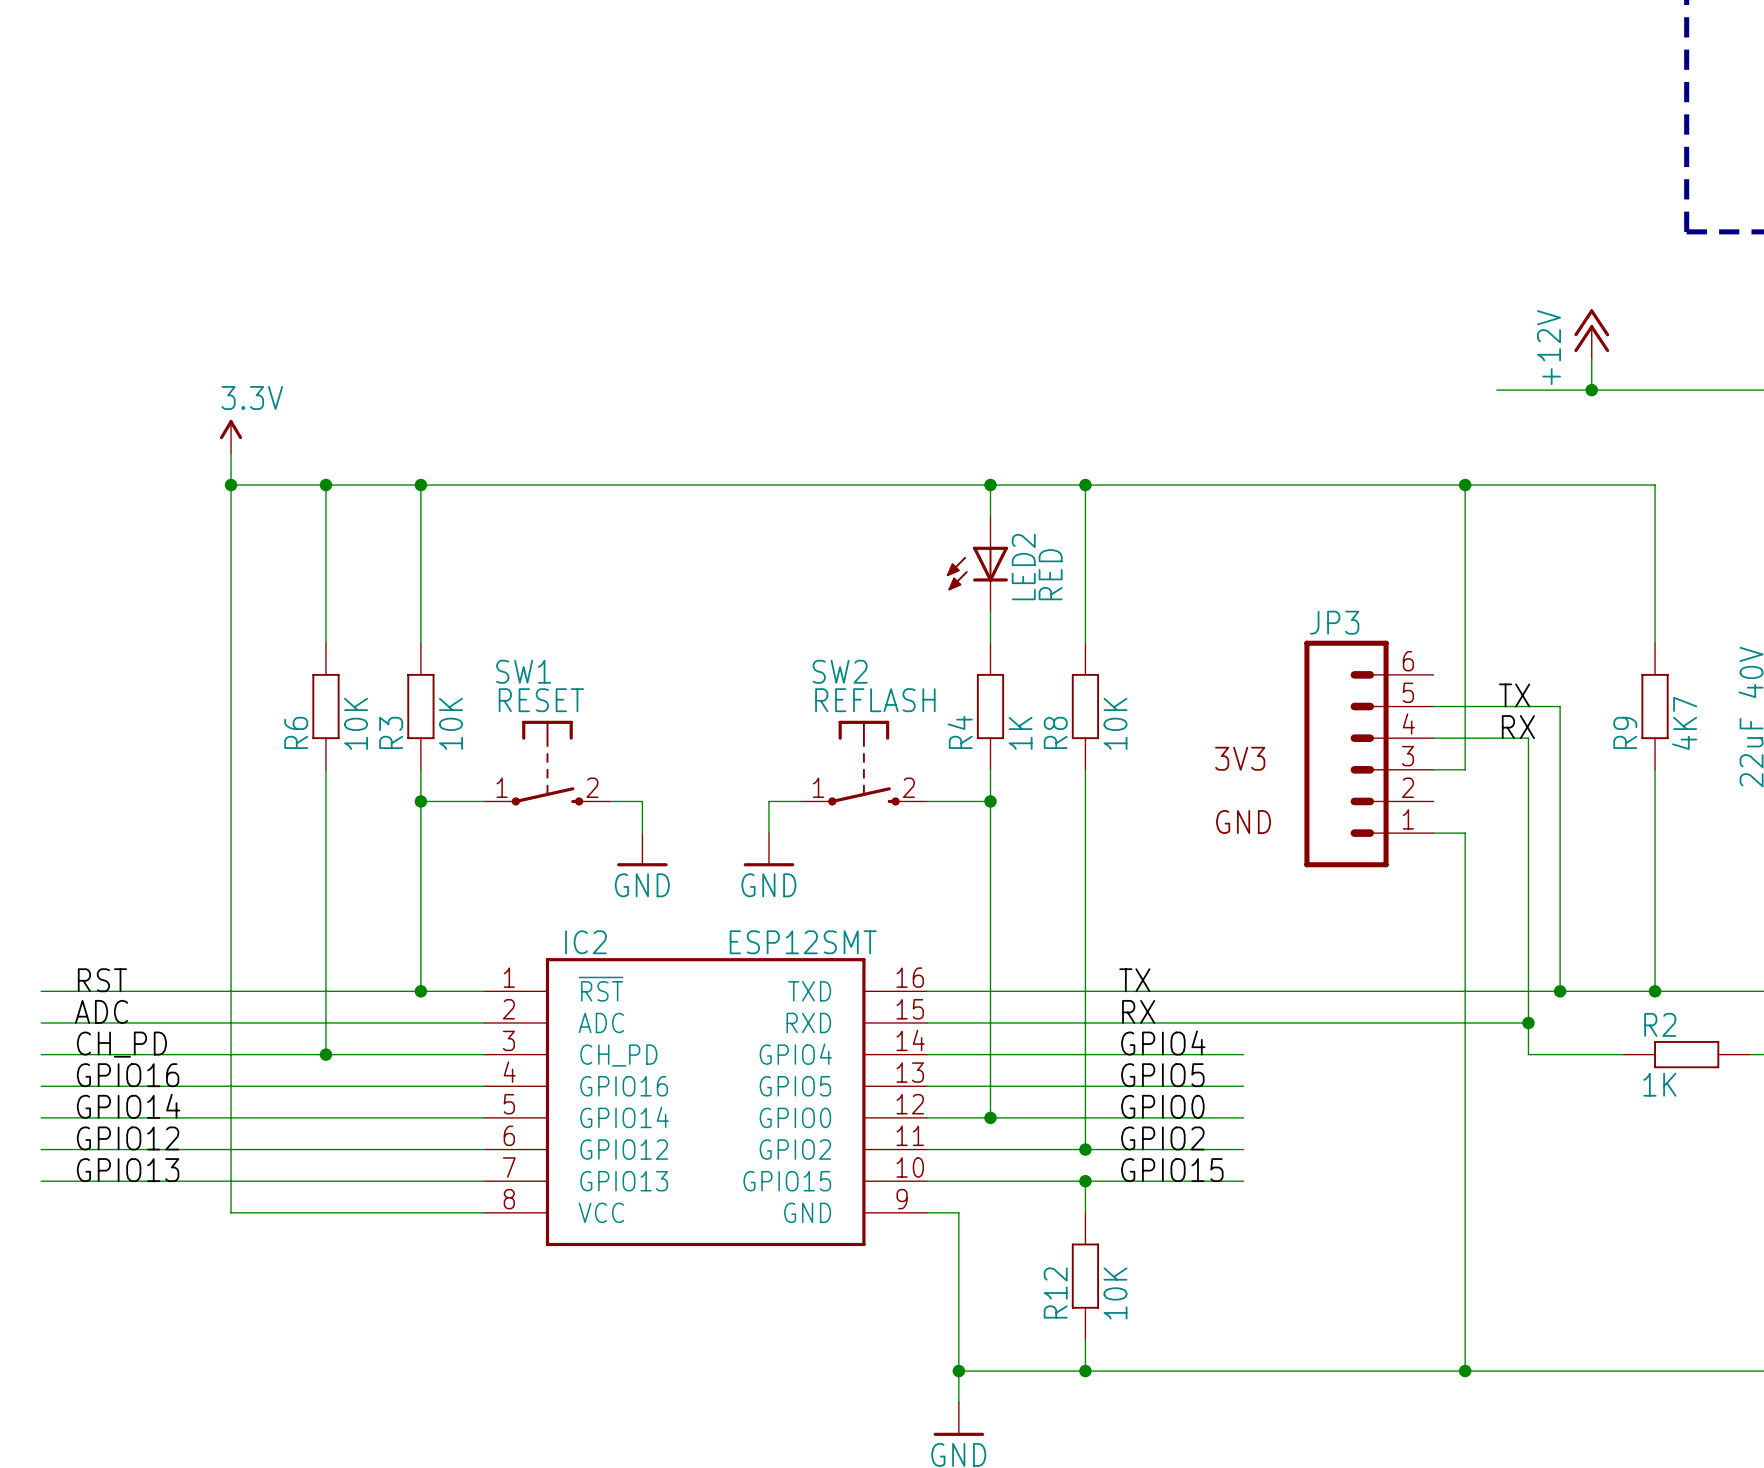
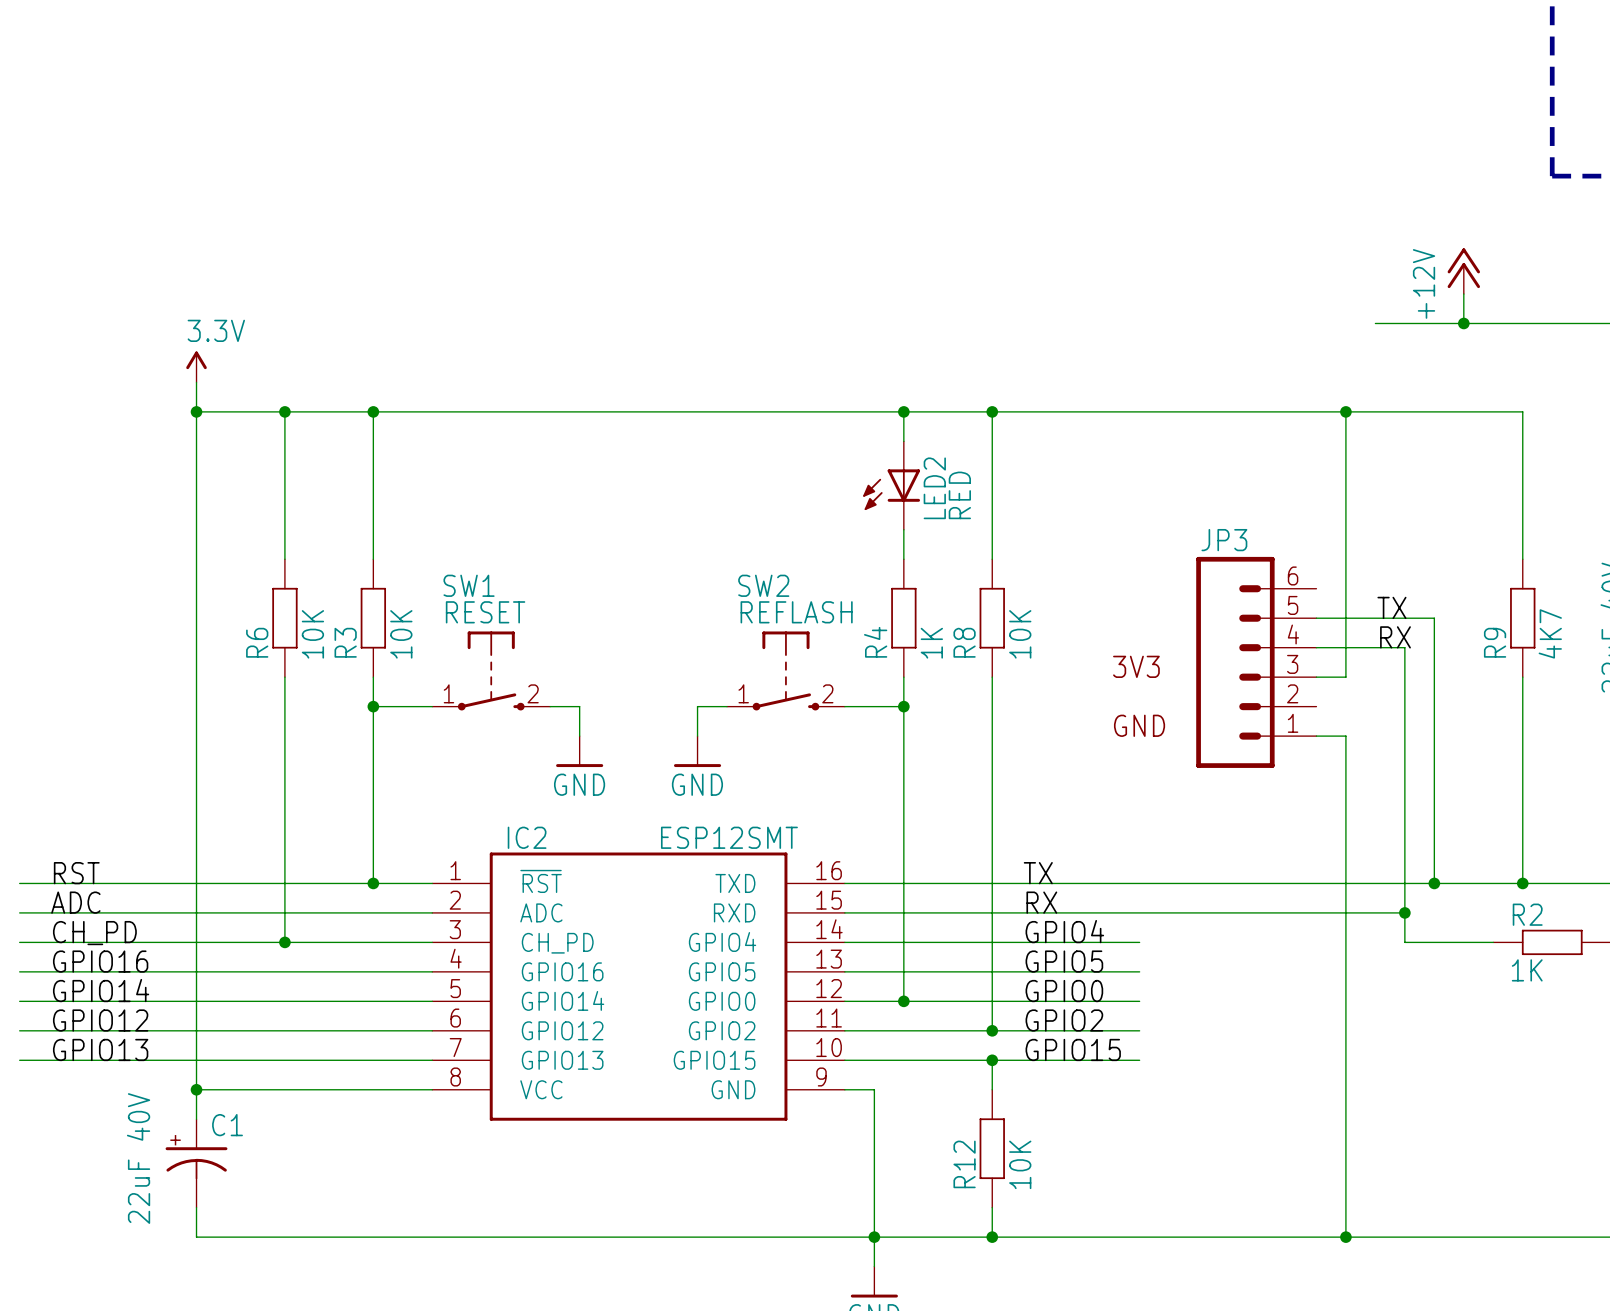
wire: none -> (196, 1089) (196, 1119)
junction: none -> (196, 1089)
C1: none -> 22uF 40V (196, 1163)
wire: none -> (196, 1207) (196, 1237) (874, 1237)

